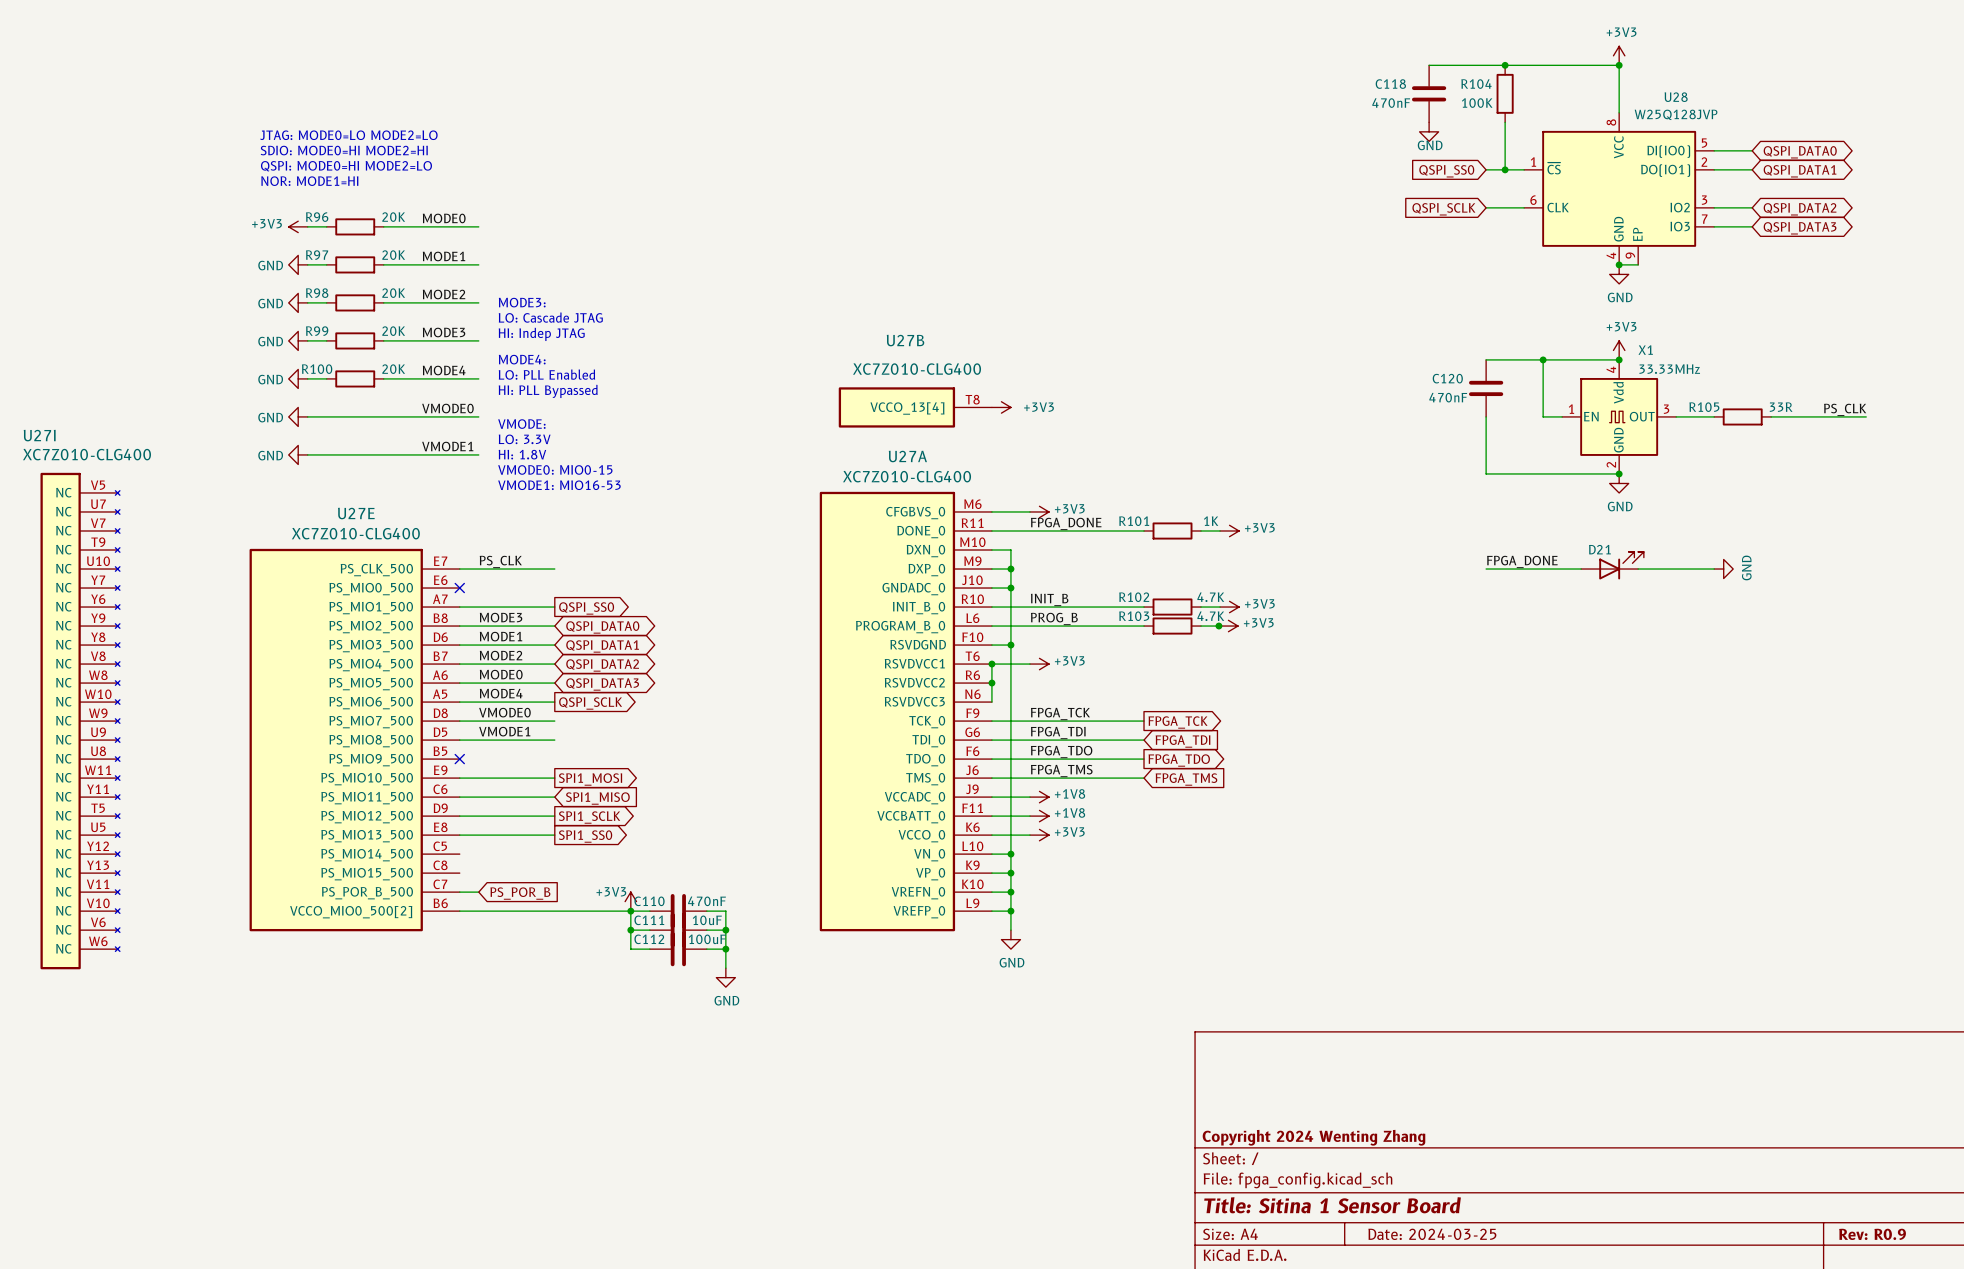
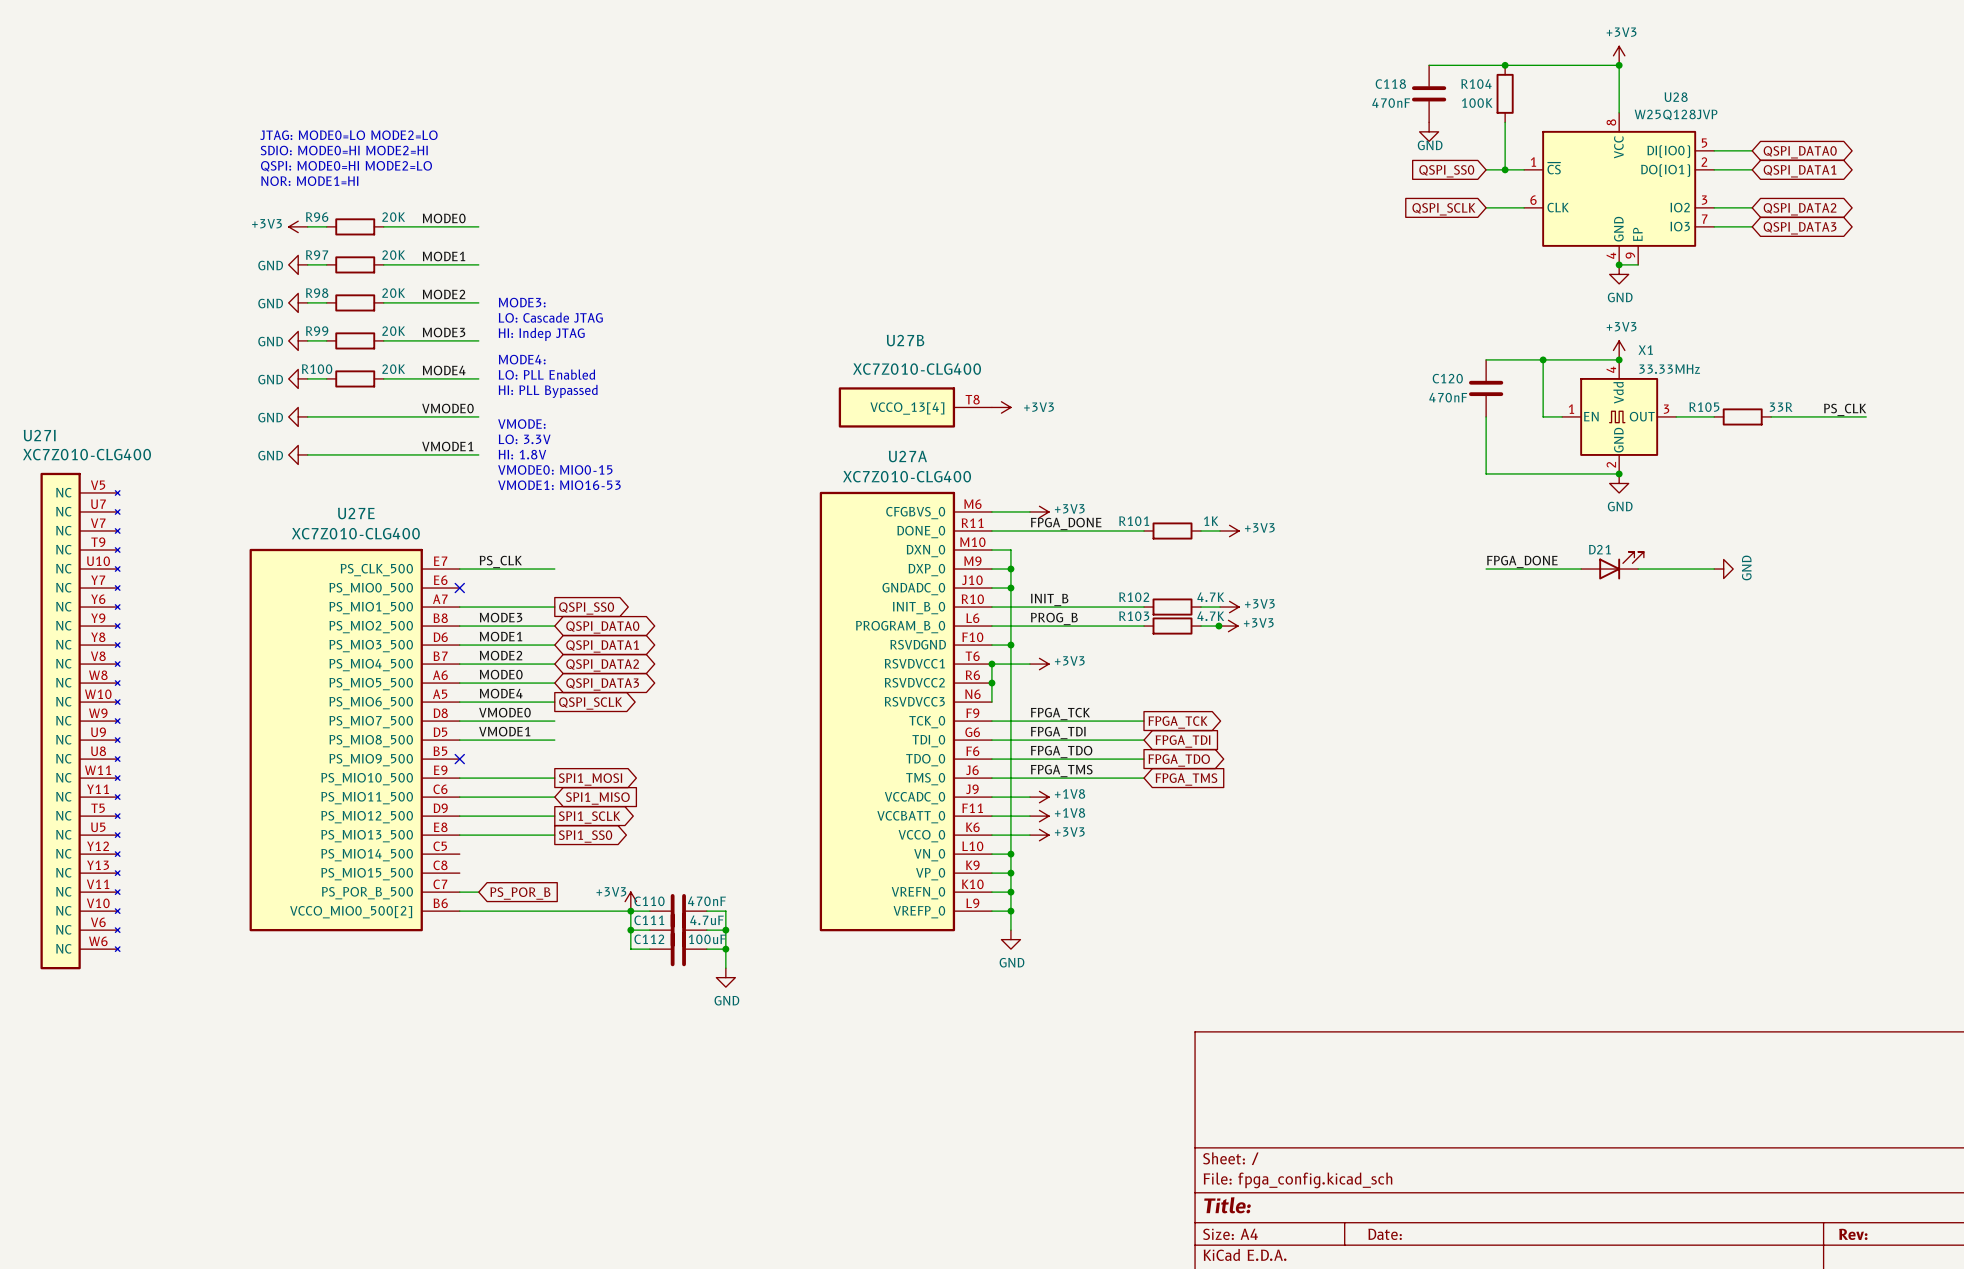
C111 value: 10uF (707, 920) -> 4.7uF (706, 920)
title block: Copyright 2024 Wenting Zhang (1313, 1137) -> none
title block: Title: Sitina 1 Sensor Board (1332, 1205) -> Title: (1227, 1205)
title block: Date: 2024-03-25 (1432, 1234) -> Date: (1385, 1234)
title block: Rev: R0.9 (1872, 1234) -> Rev: (1853, 1234)

